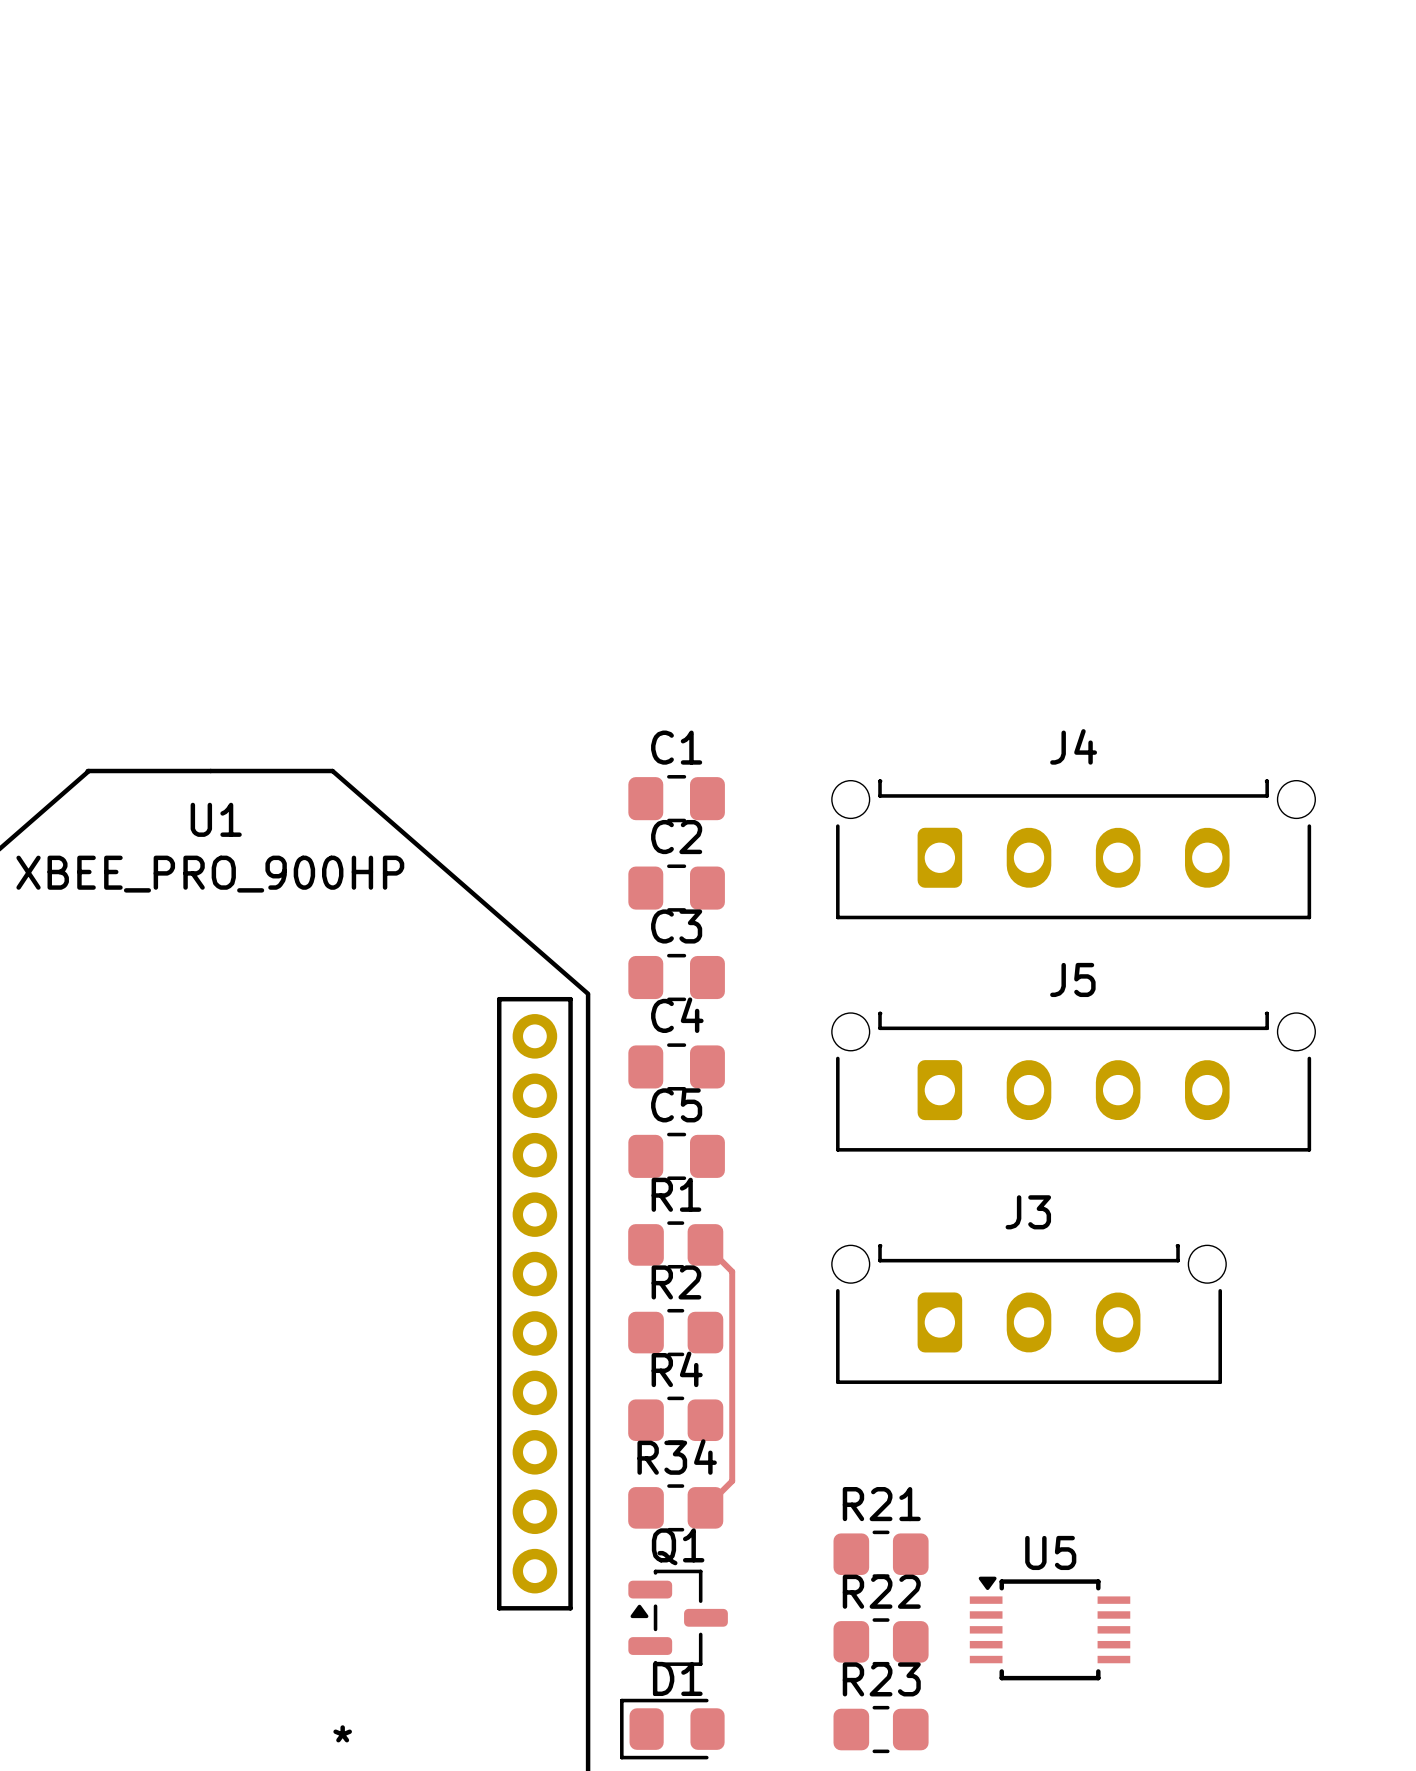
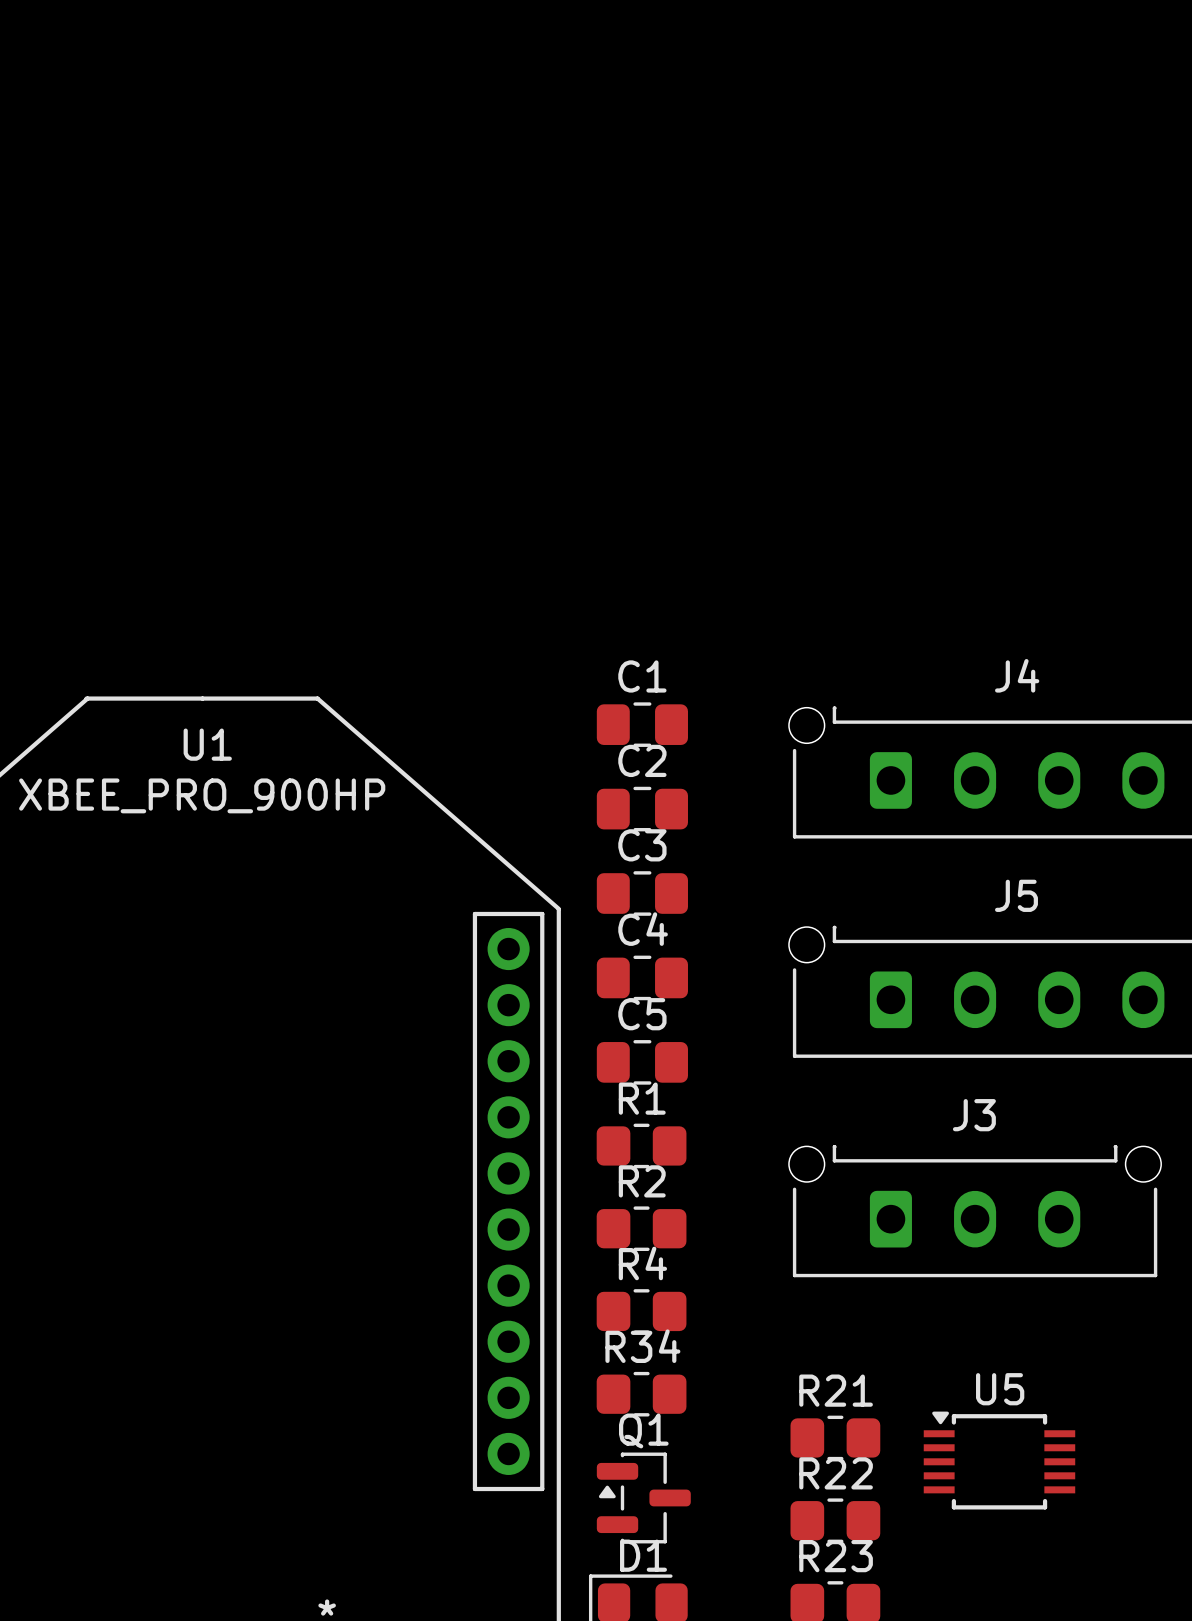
top track: (705, 1244) (732, 1271) (732, 1481) (705, 1507) -> none
U5 position: (1050, 1628) -> (999, 1460)

